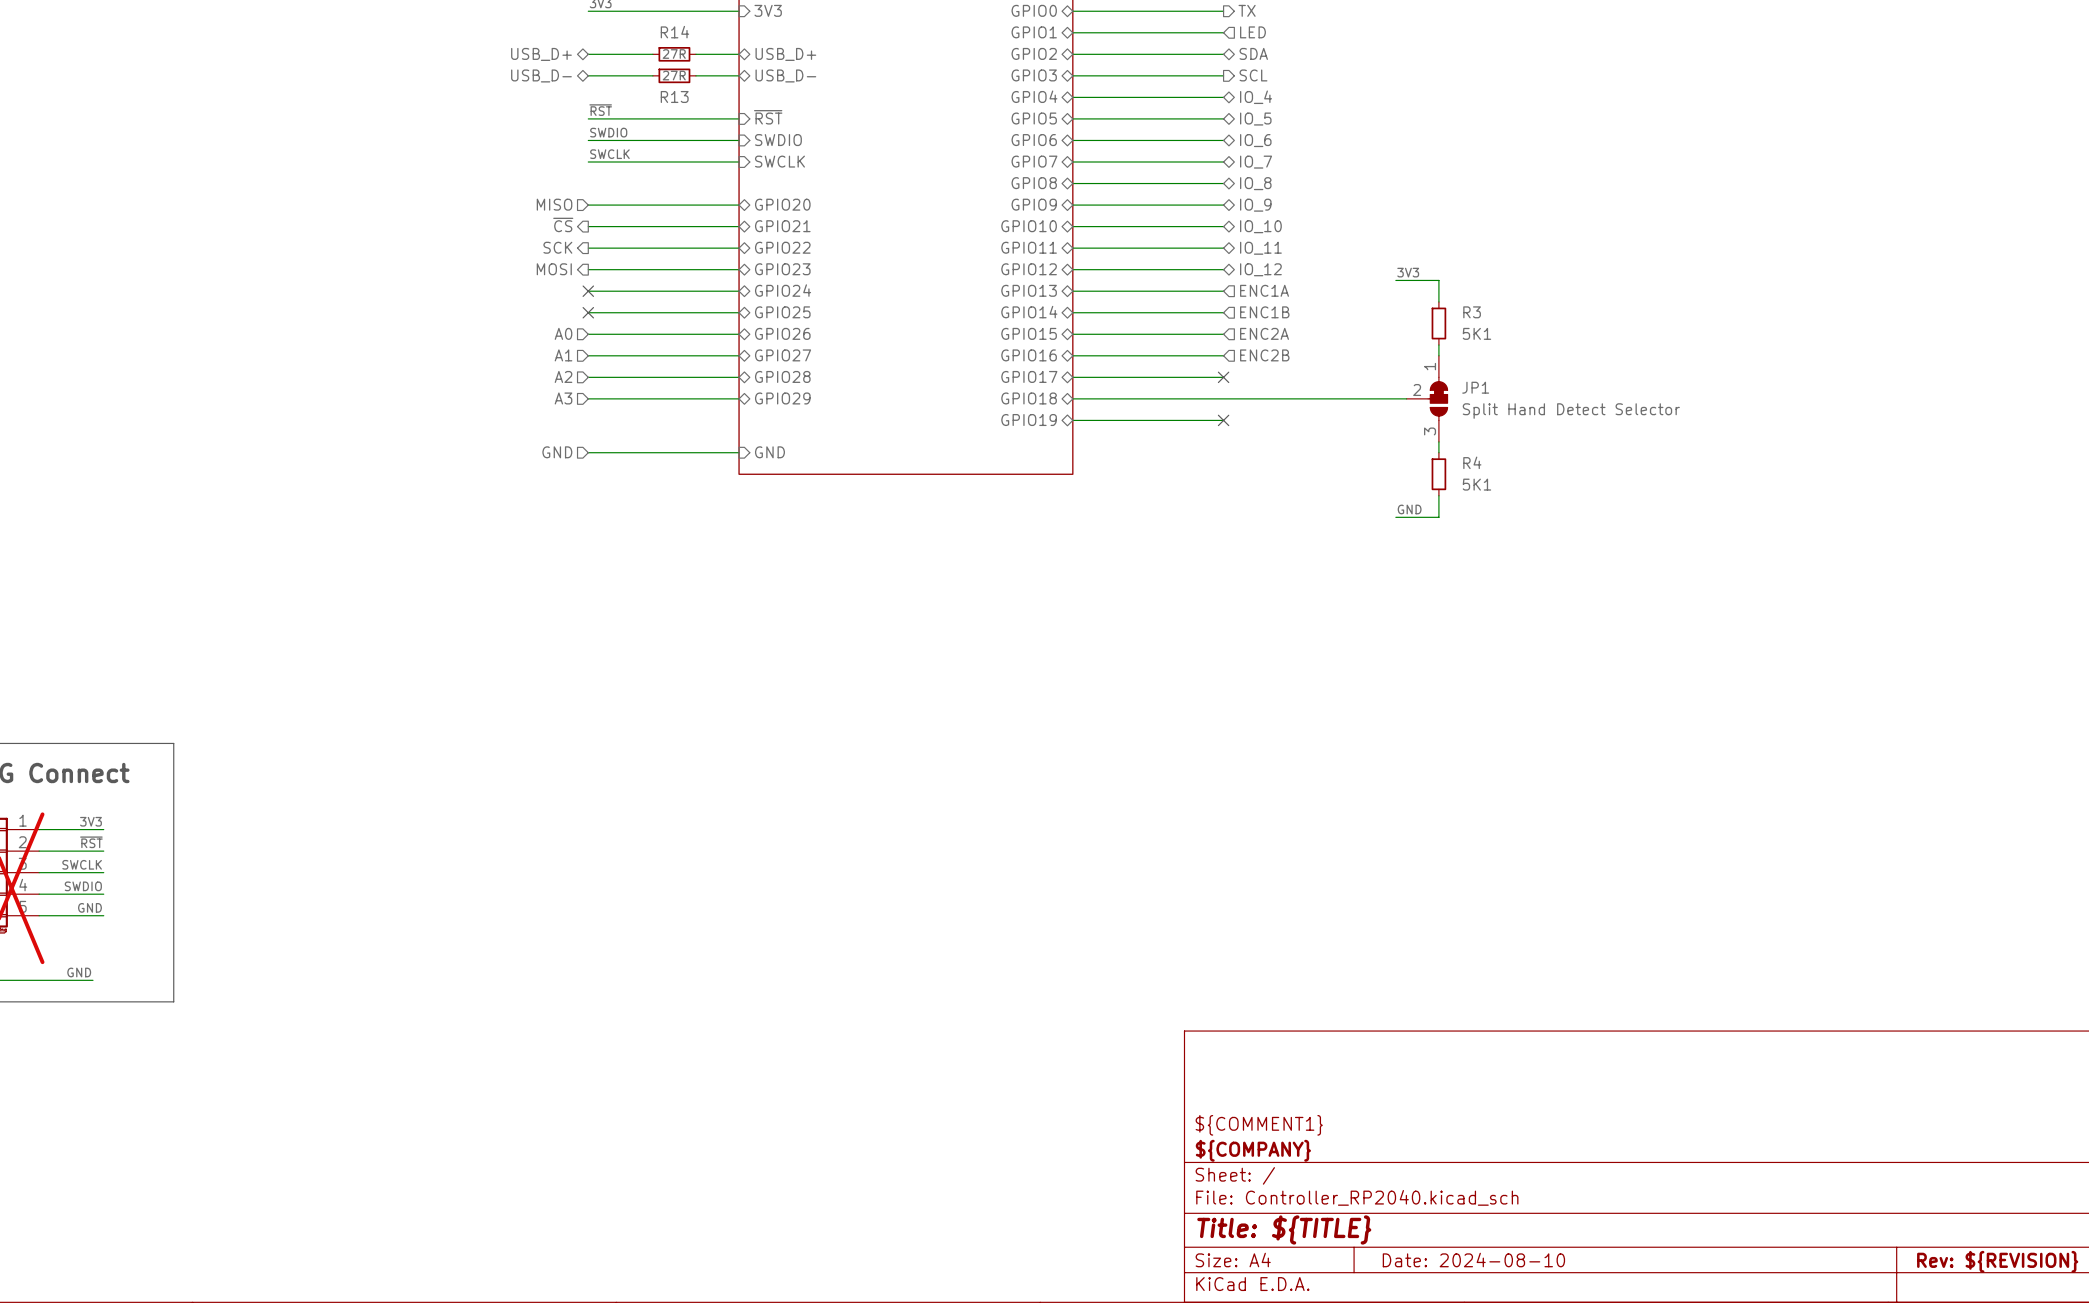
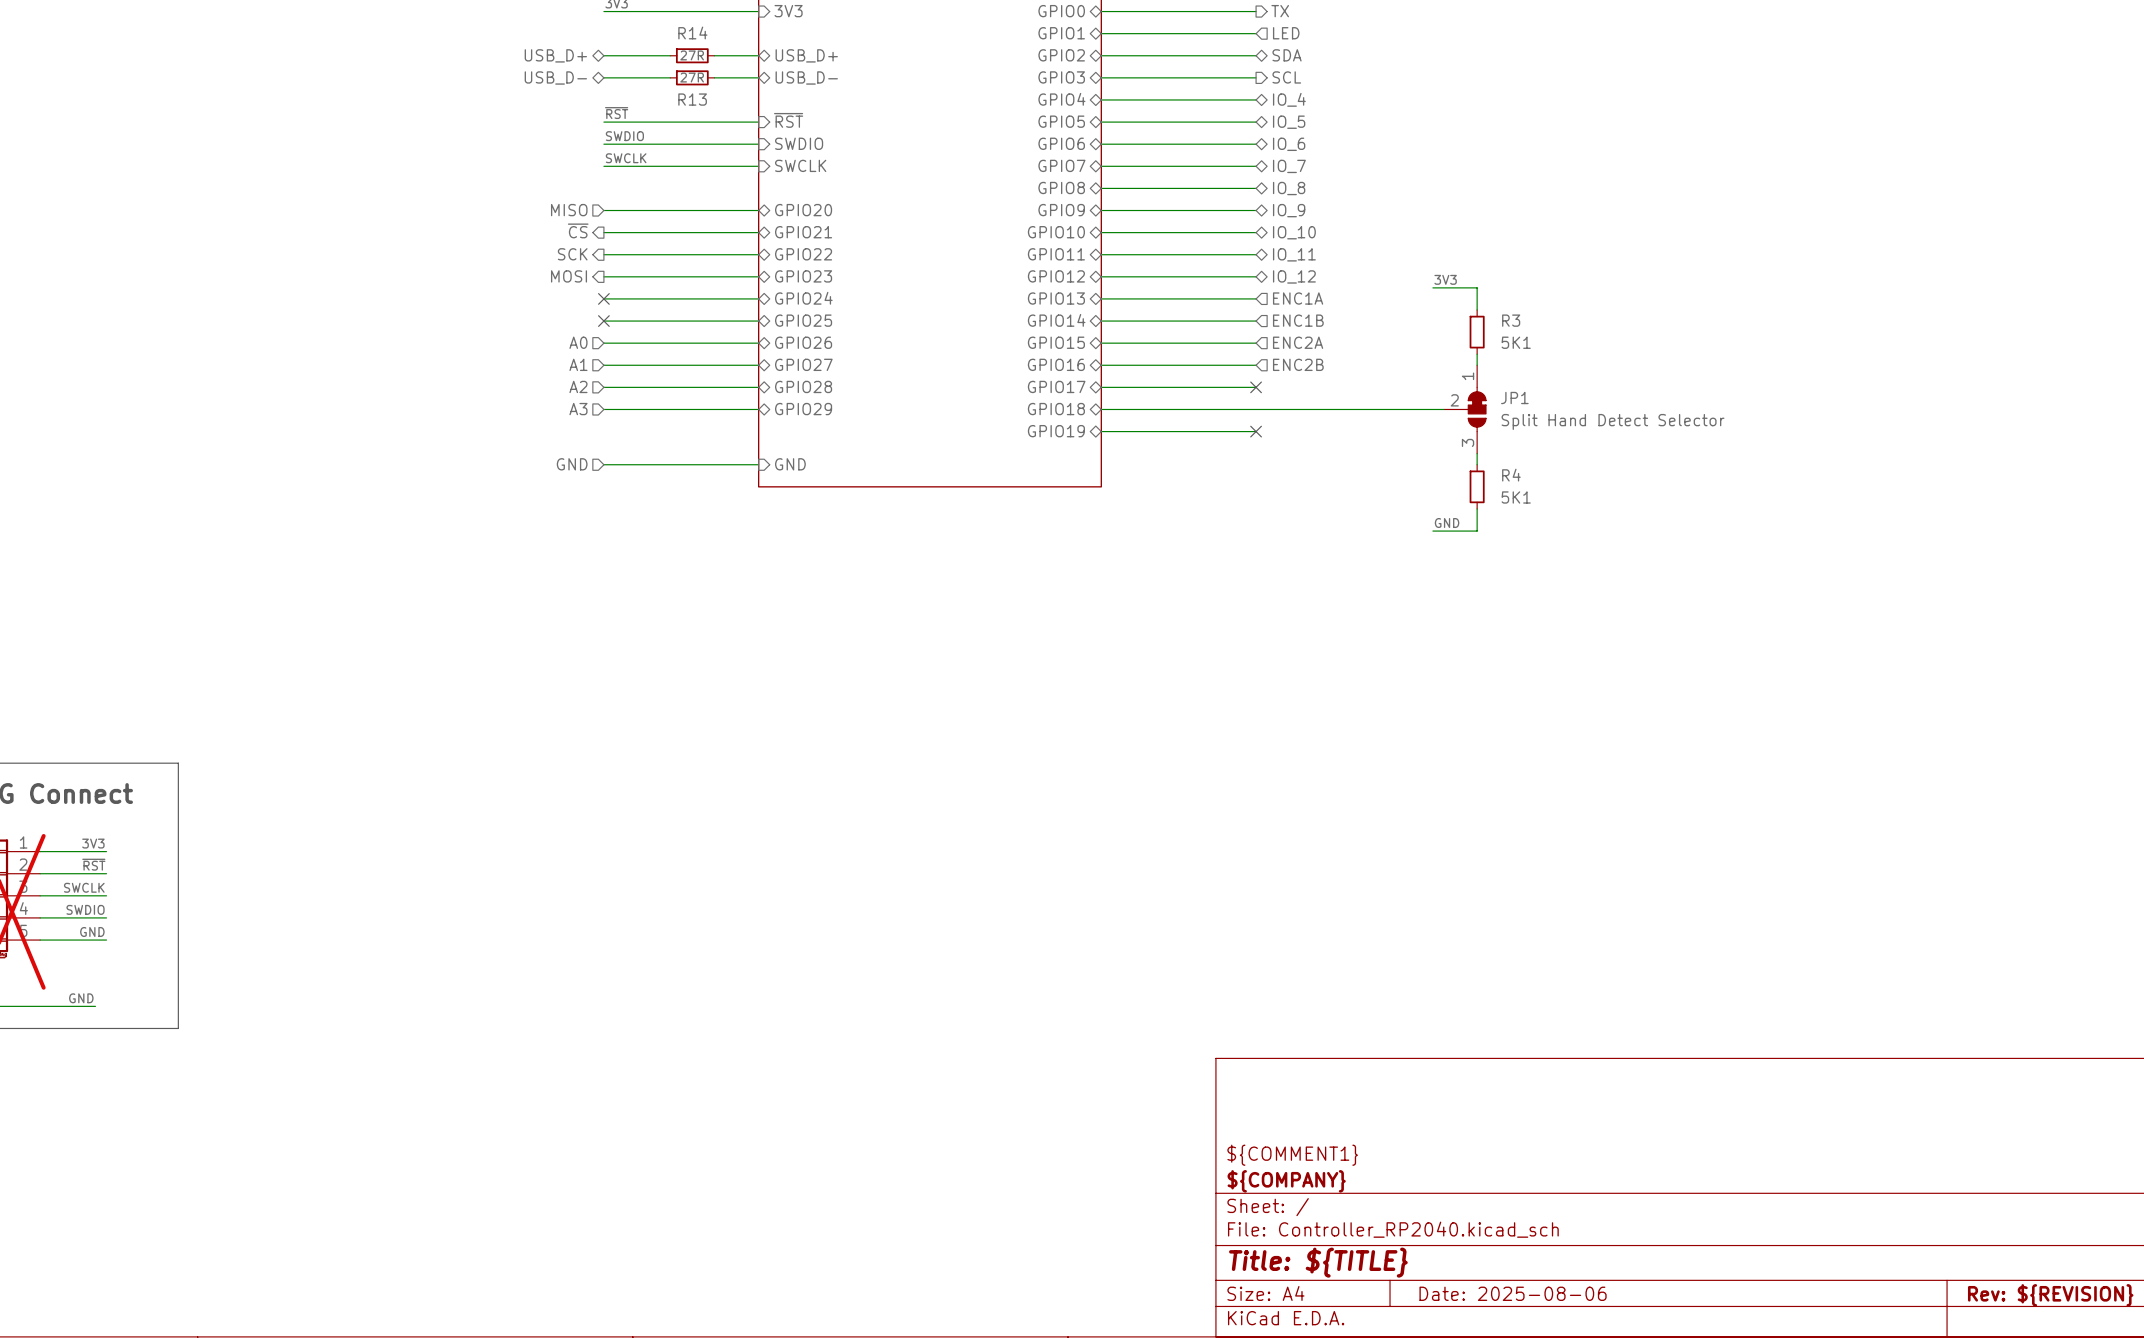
title block: Date: 2024-08-10 (1473, 1260) -> Date: 2025-08-06 (1513, 1293)

